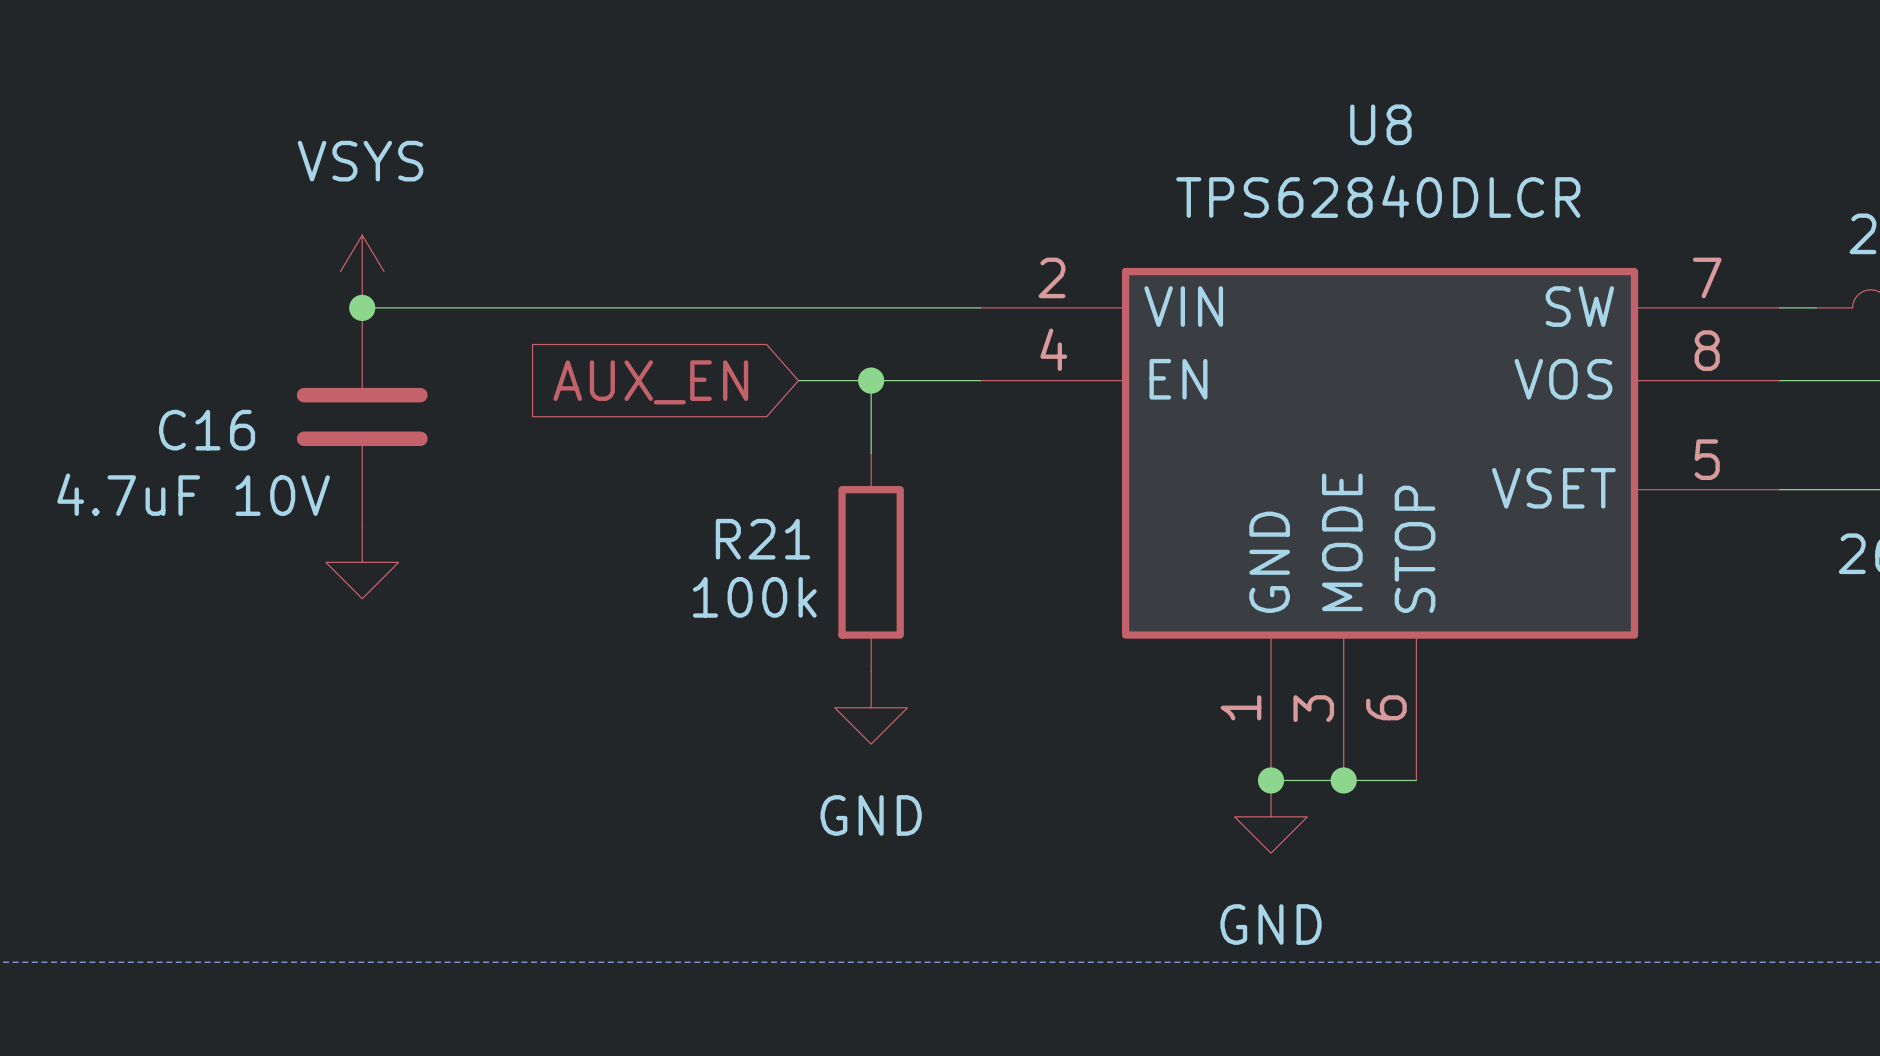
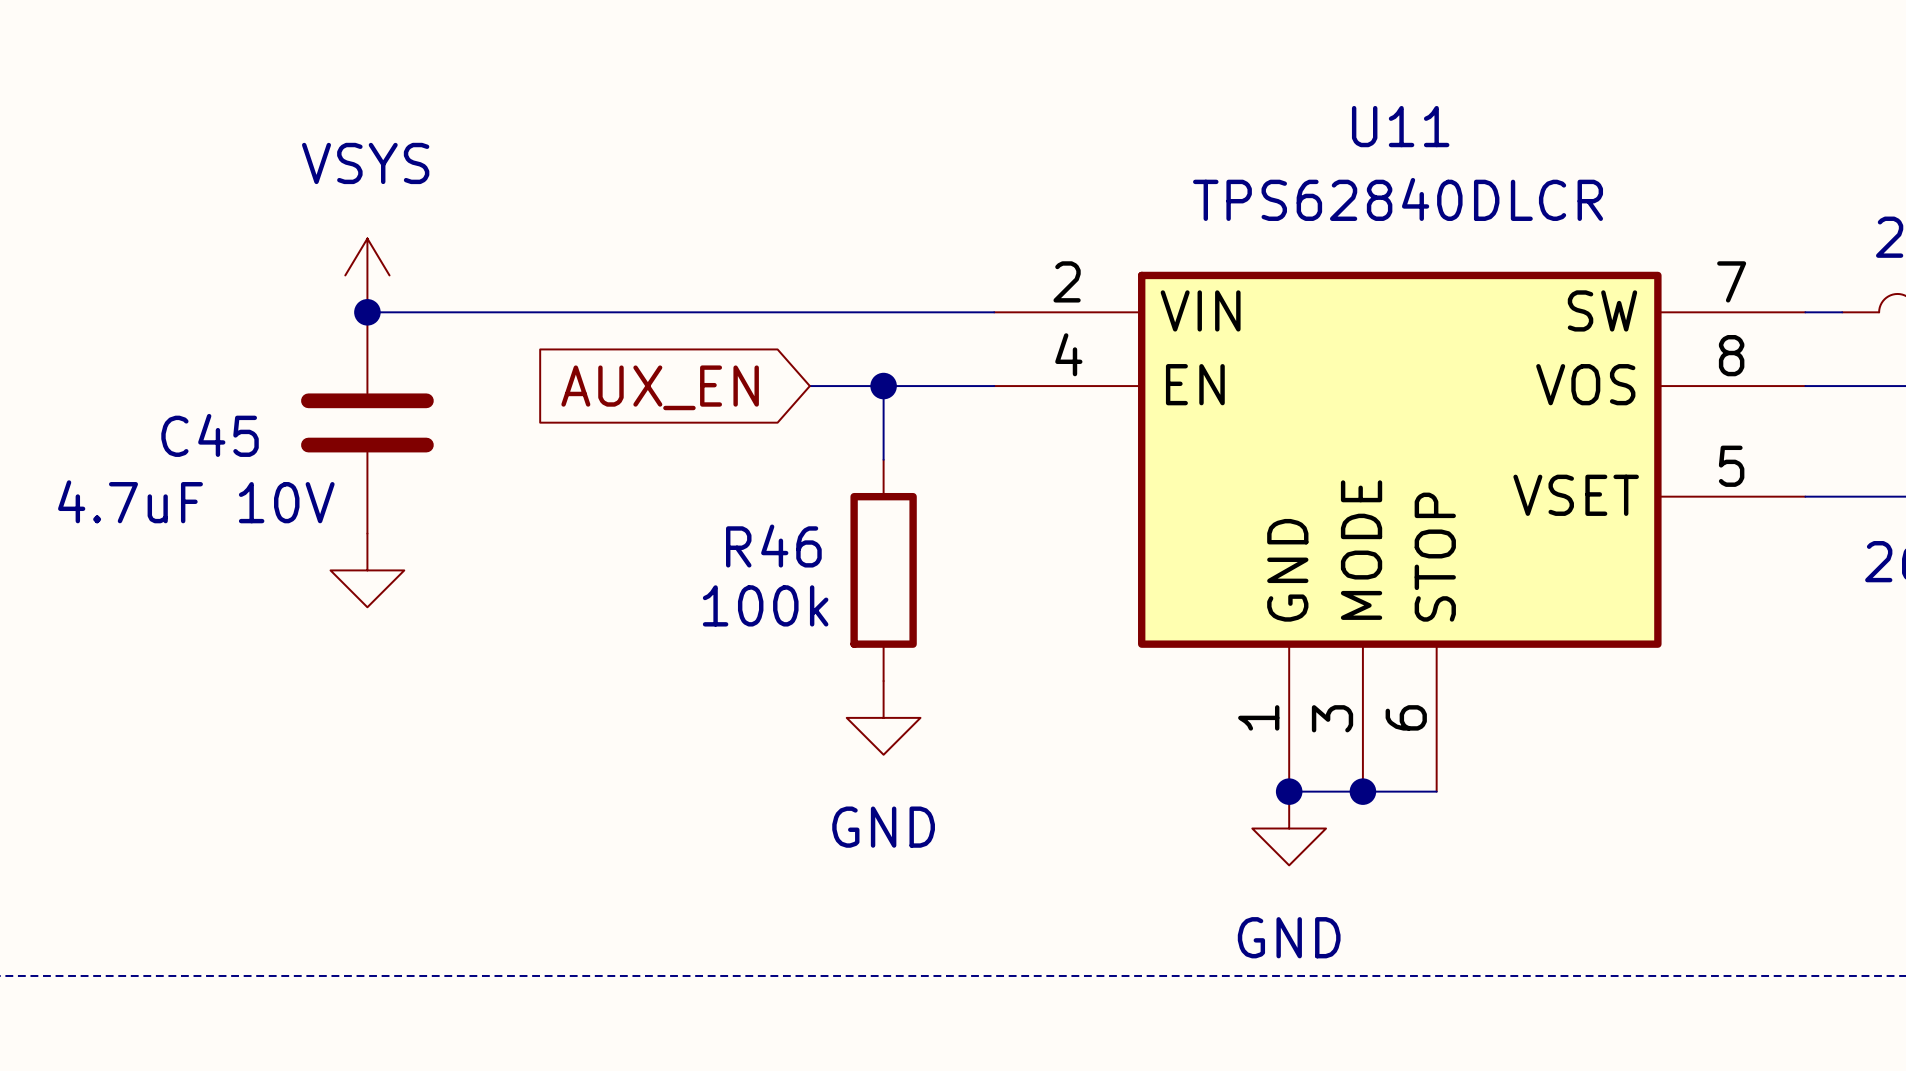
U8 name: U8 (1380, 124) -> U11 (1400, 126)
C16 name: C16 (207, 430) -> C45 (210, 435)
R21 name: R21 (762, 539) -> R46 (773, 546)

